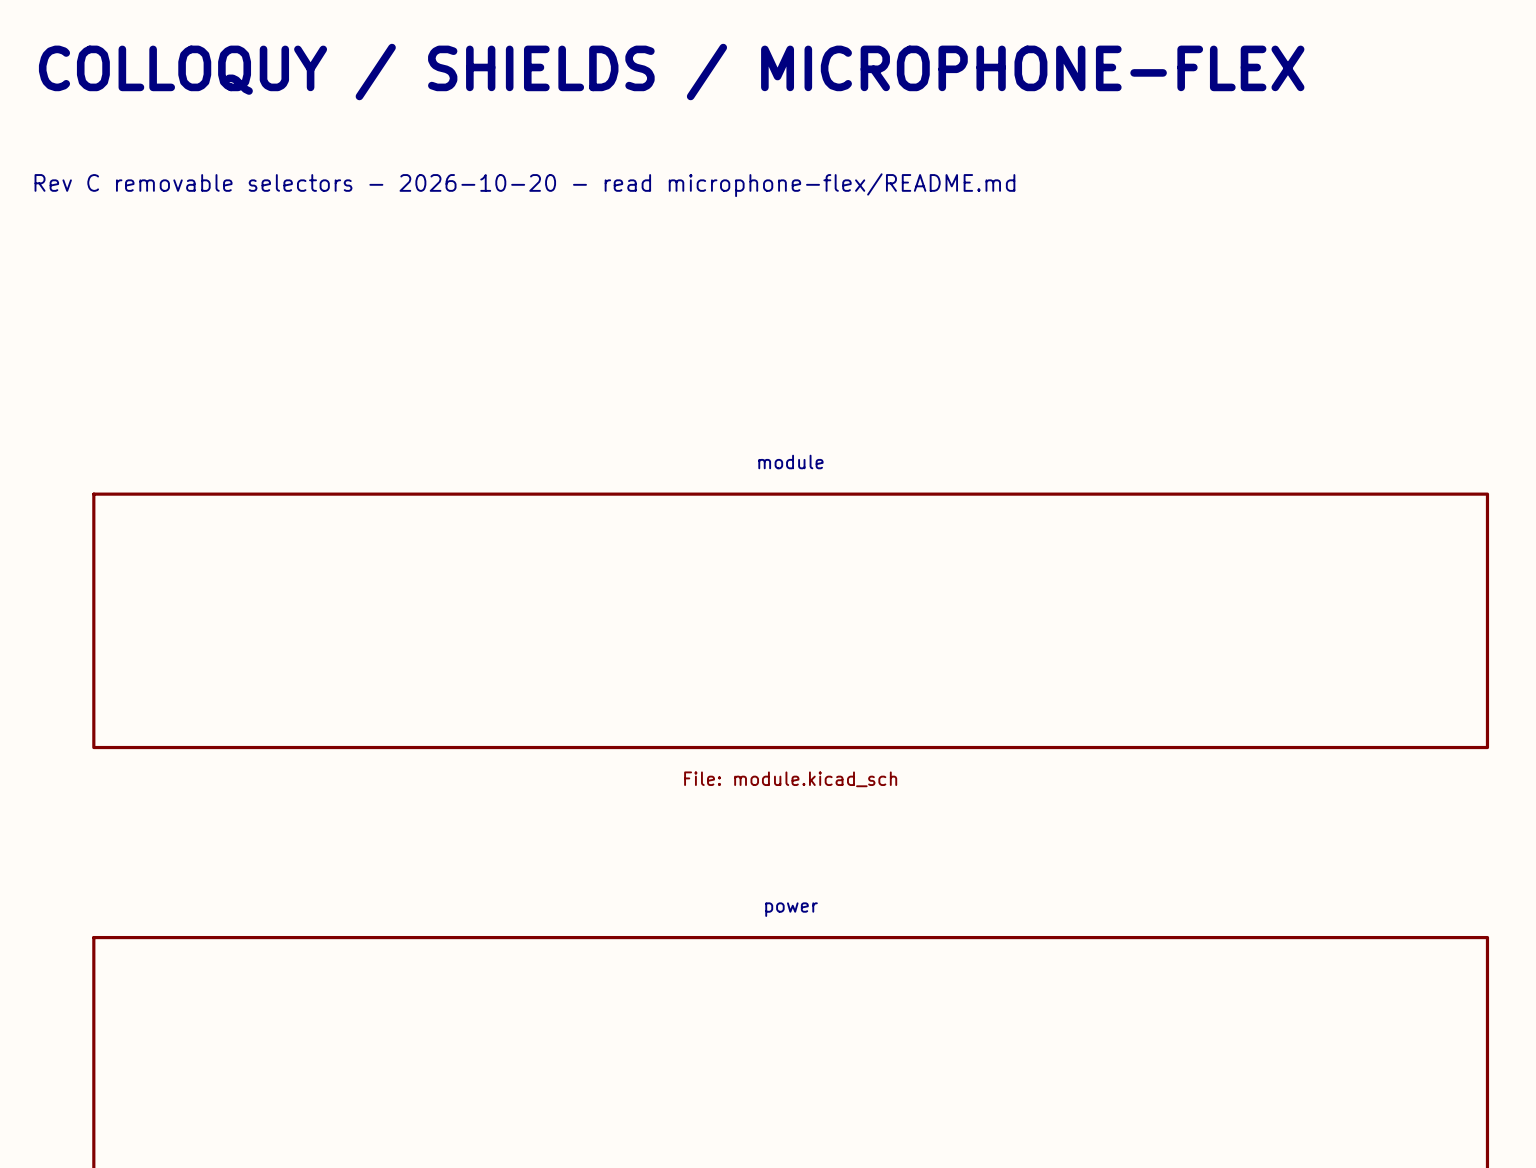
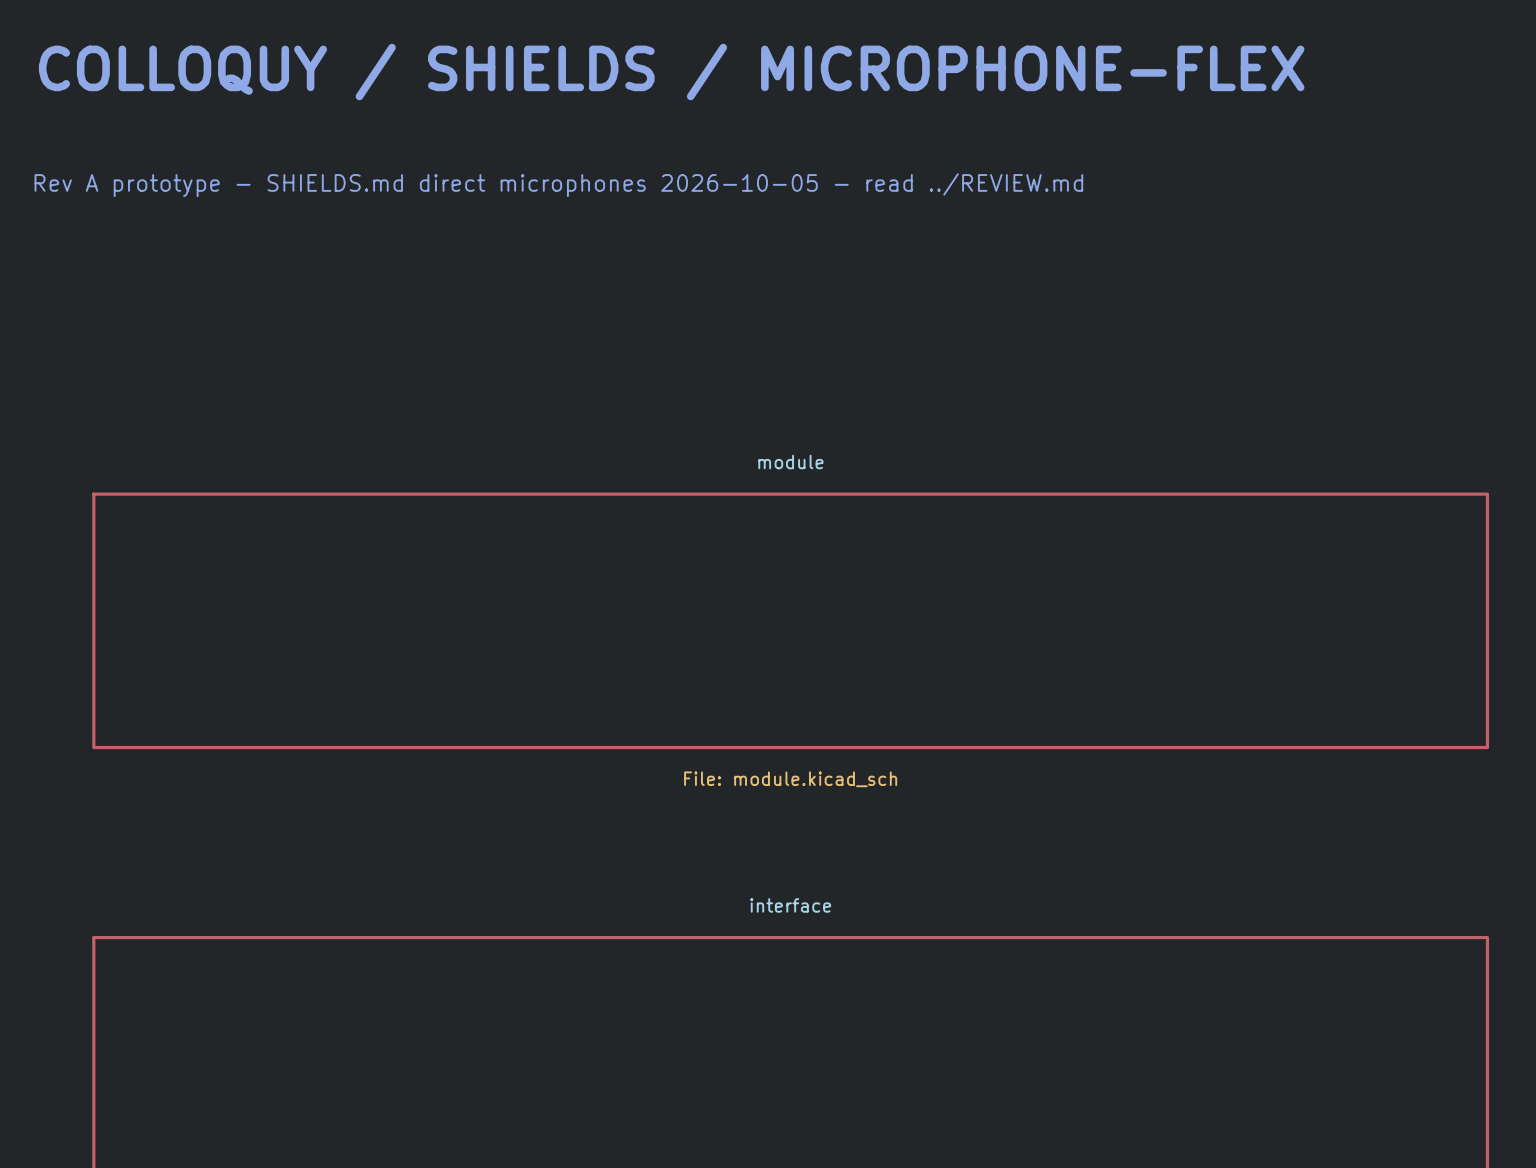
text: Rev C removable selectors - 2026-10-20 - read microphone-flex/README.md (524, 185) -> Rev A prototype - SHIELDS.md direct microphones 2026-10-05 - read ../REVIEW.md (558, 185)
sheet power name: power (791, 909) -> interface (790, 905)

